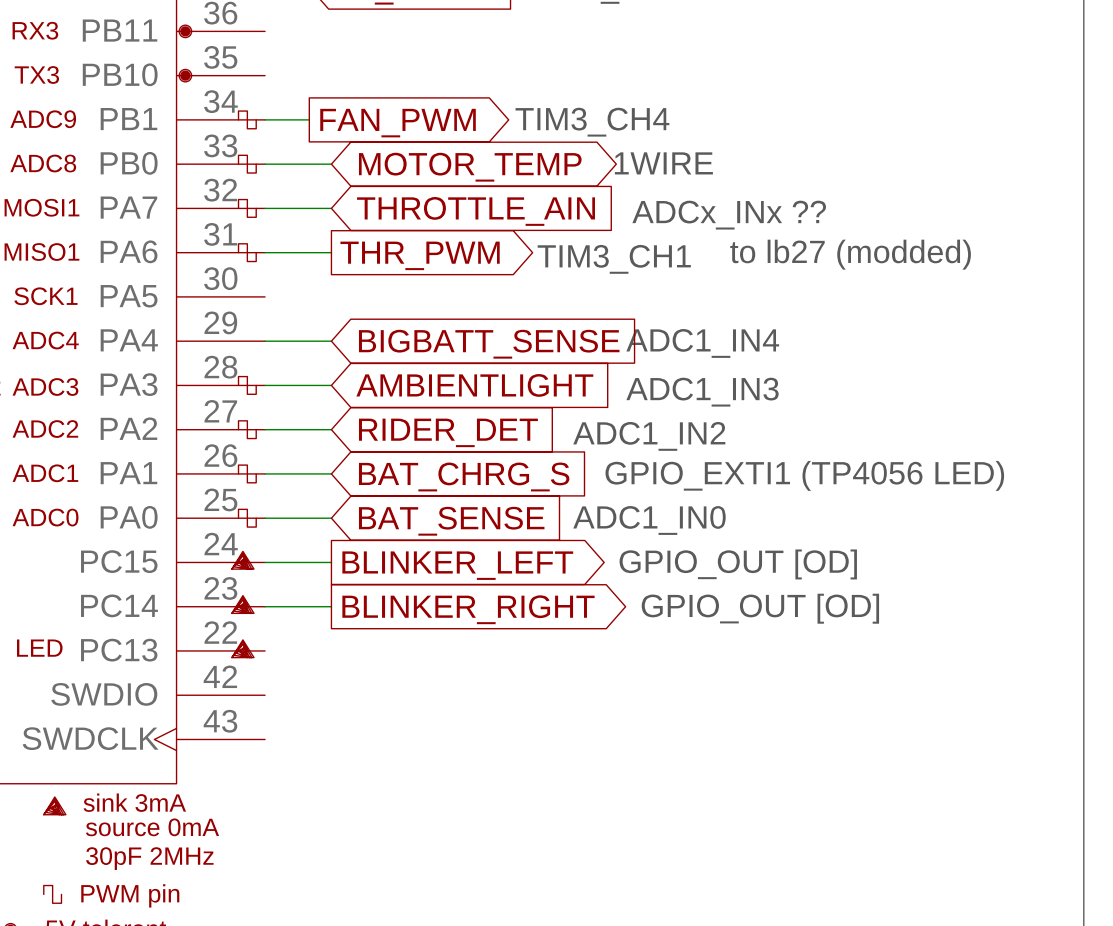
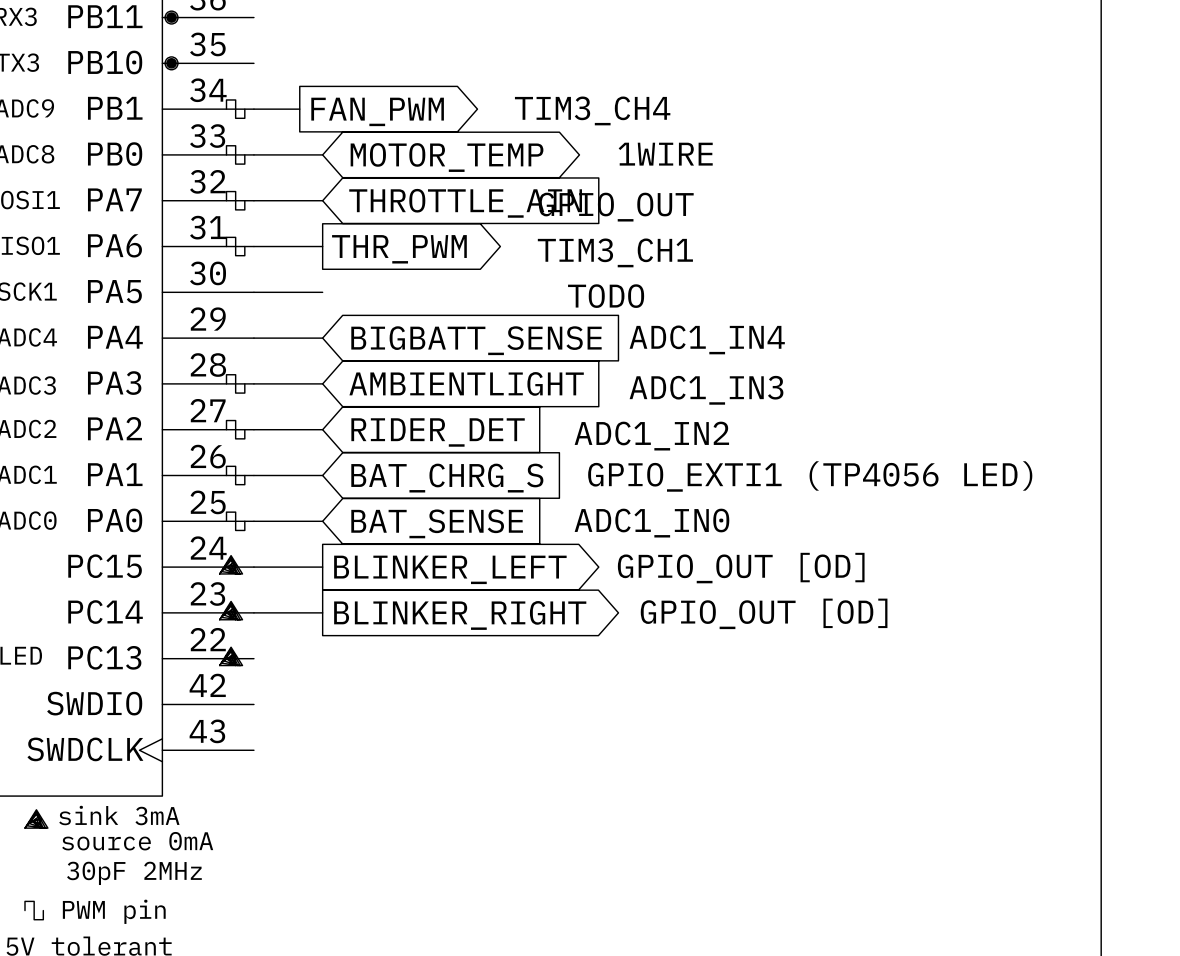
text: none -> GPIO_OUT (616, 207)
text: ADCx_INx ?? (729, 215) -> none
text: to lb27 (modded) (850, 254) -> none
wire: none -> (253, 292) (322, 292)
text: none -> TODO (606, 296)

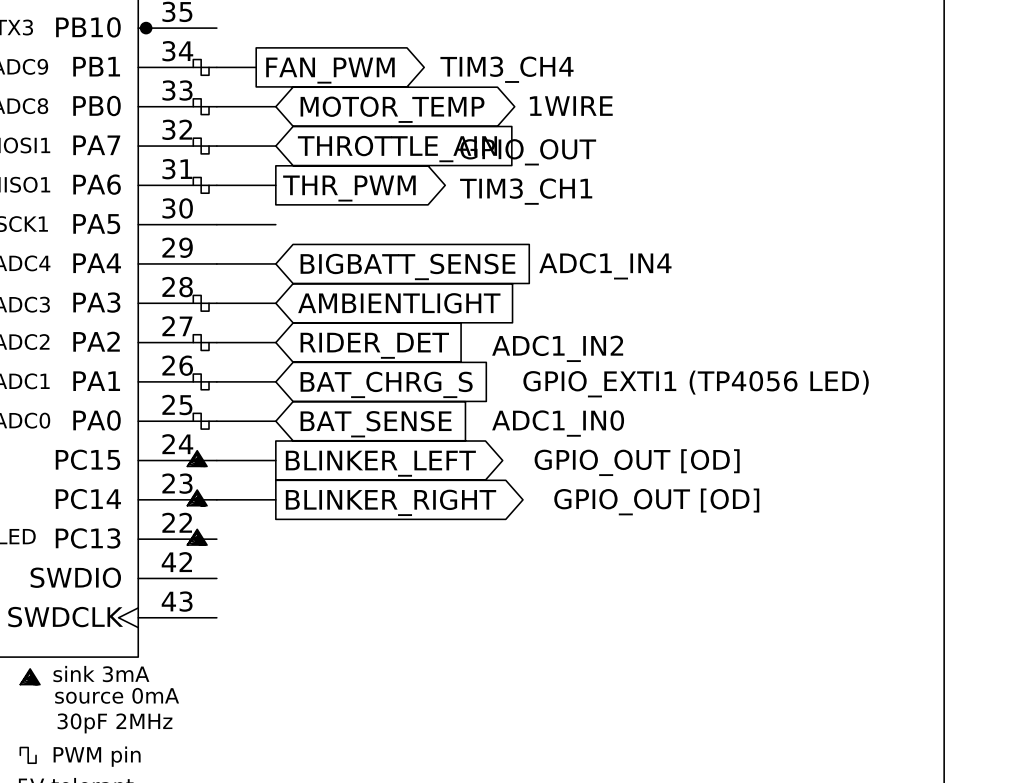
text: TODO (606, 296) -> none
text: ADC1_IN3 (706, 390) -> none

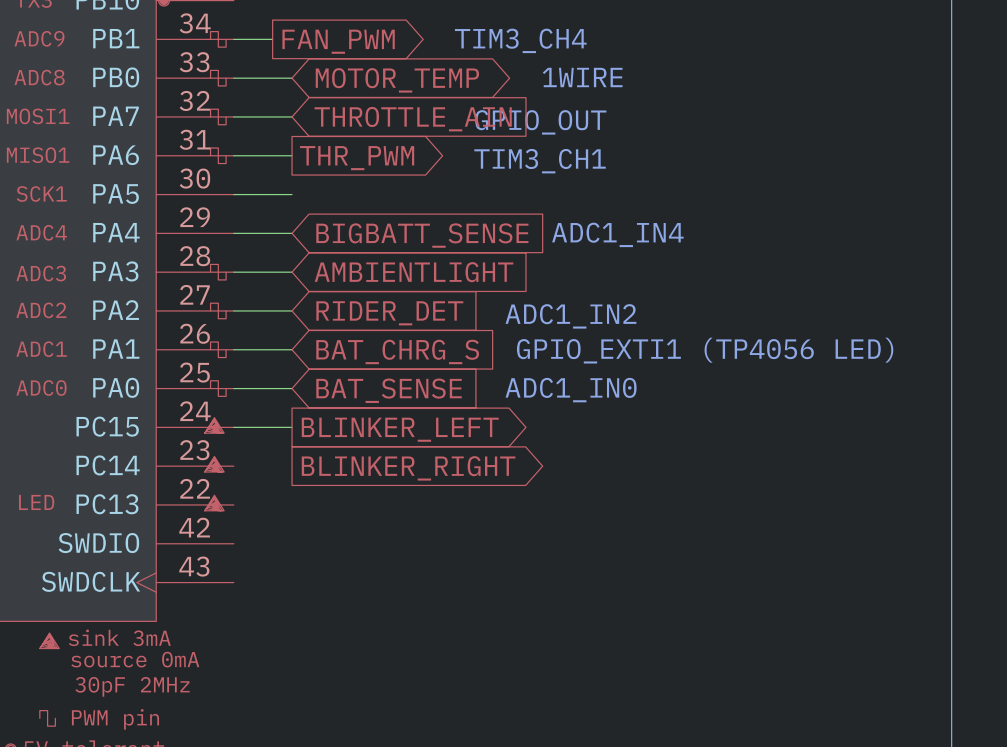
text: GPIO_OUT [OD] (637, 462) -> none
wire: (216, 499) (275, 499) -> none
text: GPIO_OUT [OD] (656, 501) -> none

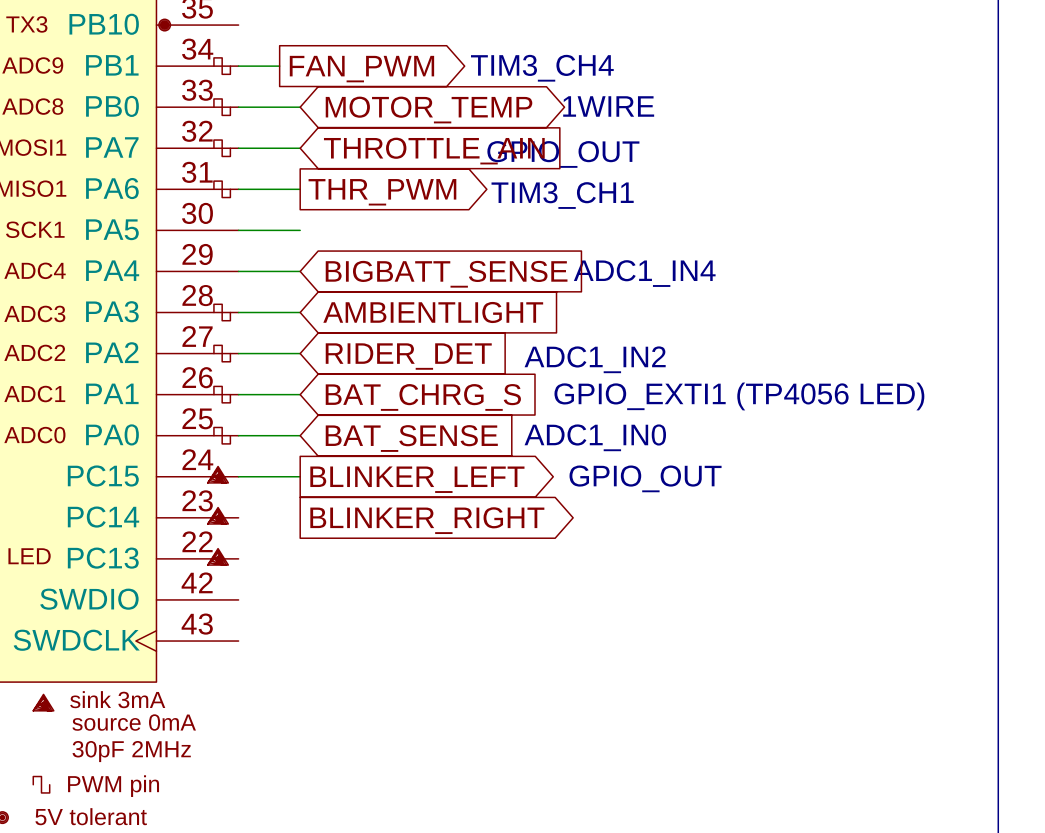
text: none -> GPIO_OUT (645, 478)

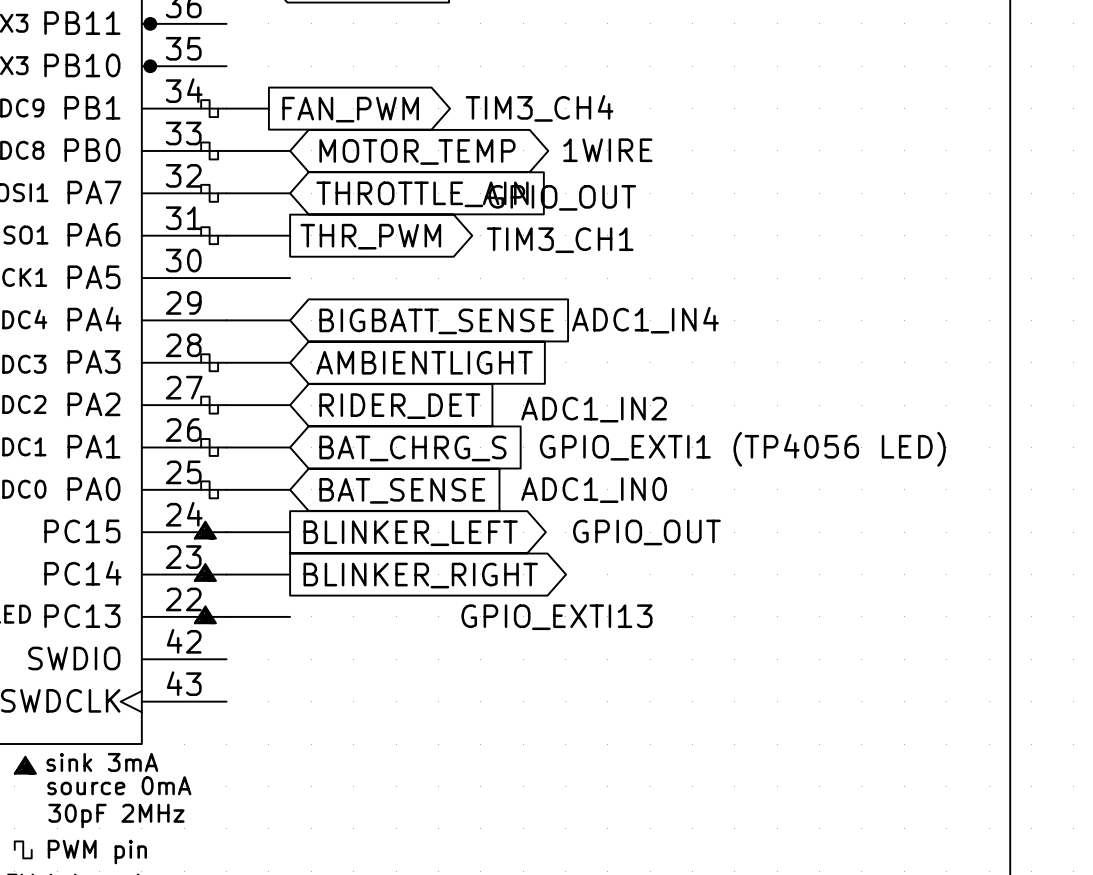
wire: none -> (226, 574) (290, 574)
wire: none -> (226, 616) (290, 616)
text: none -> GPIO_EXTI13 (556, 617)

